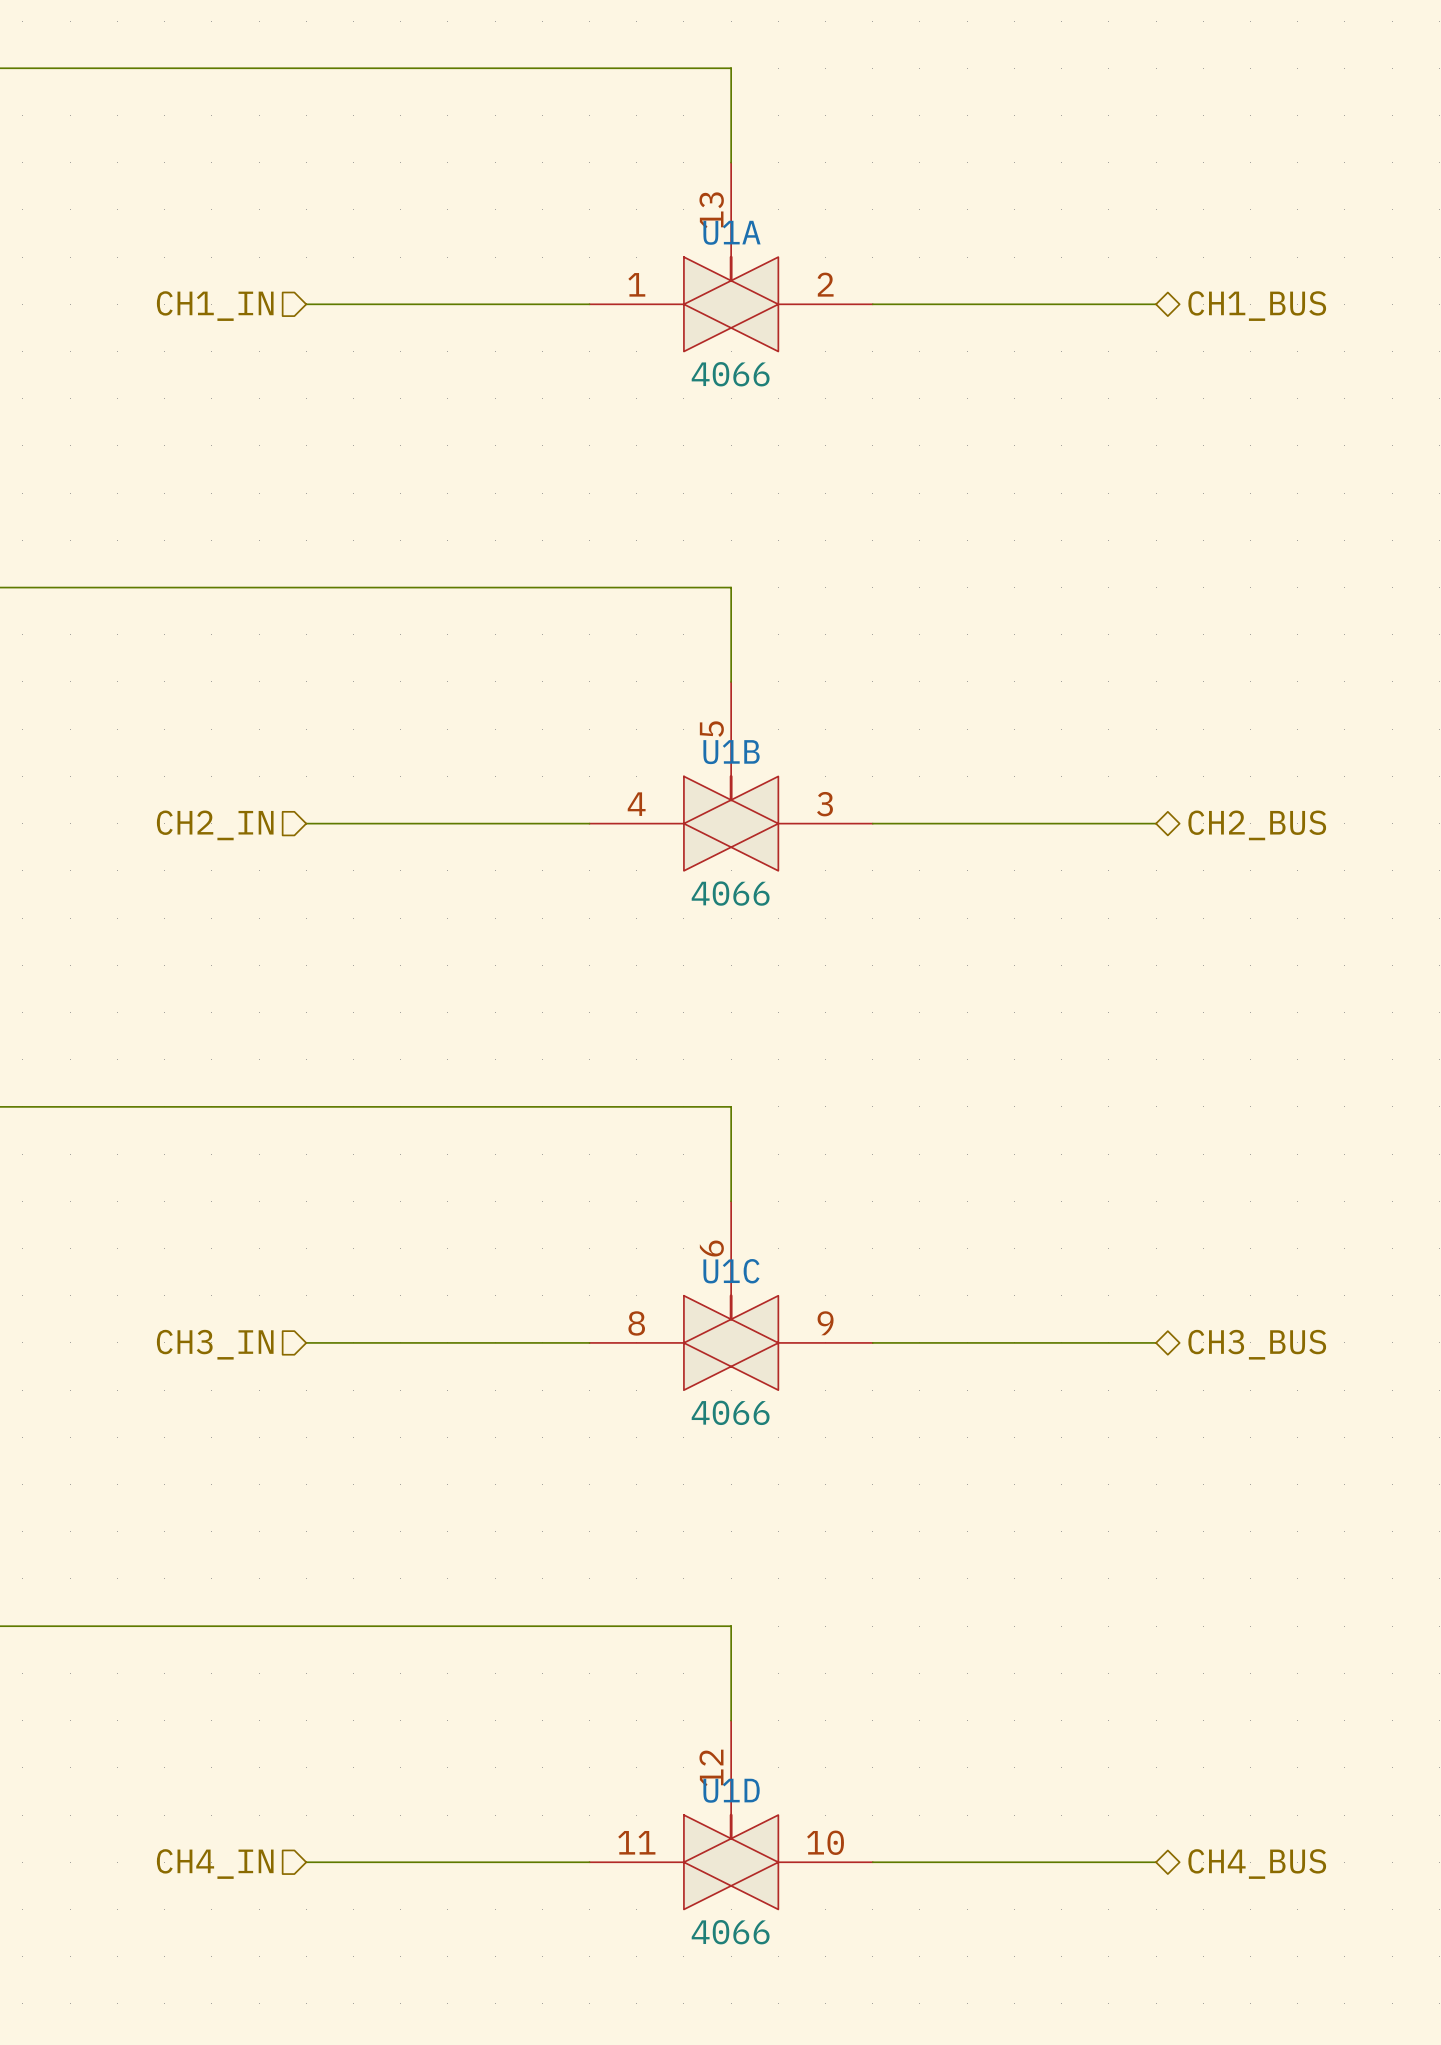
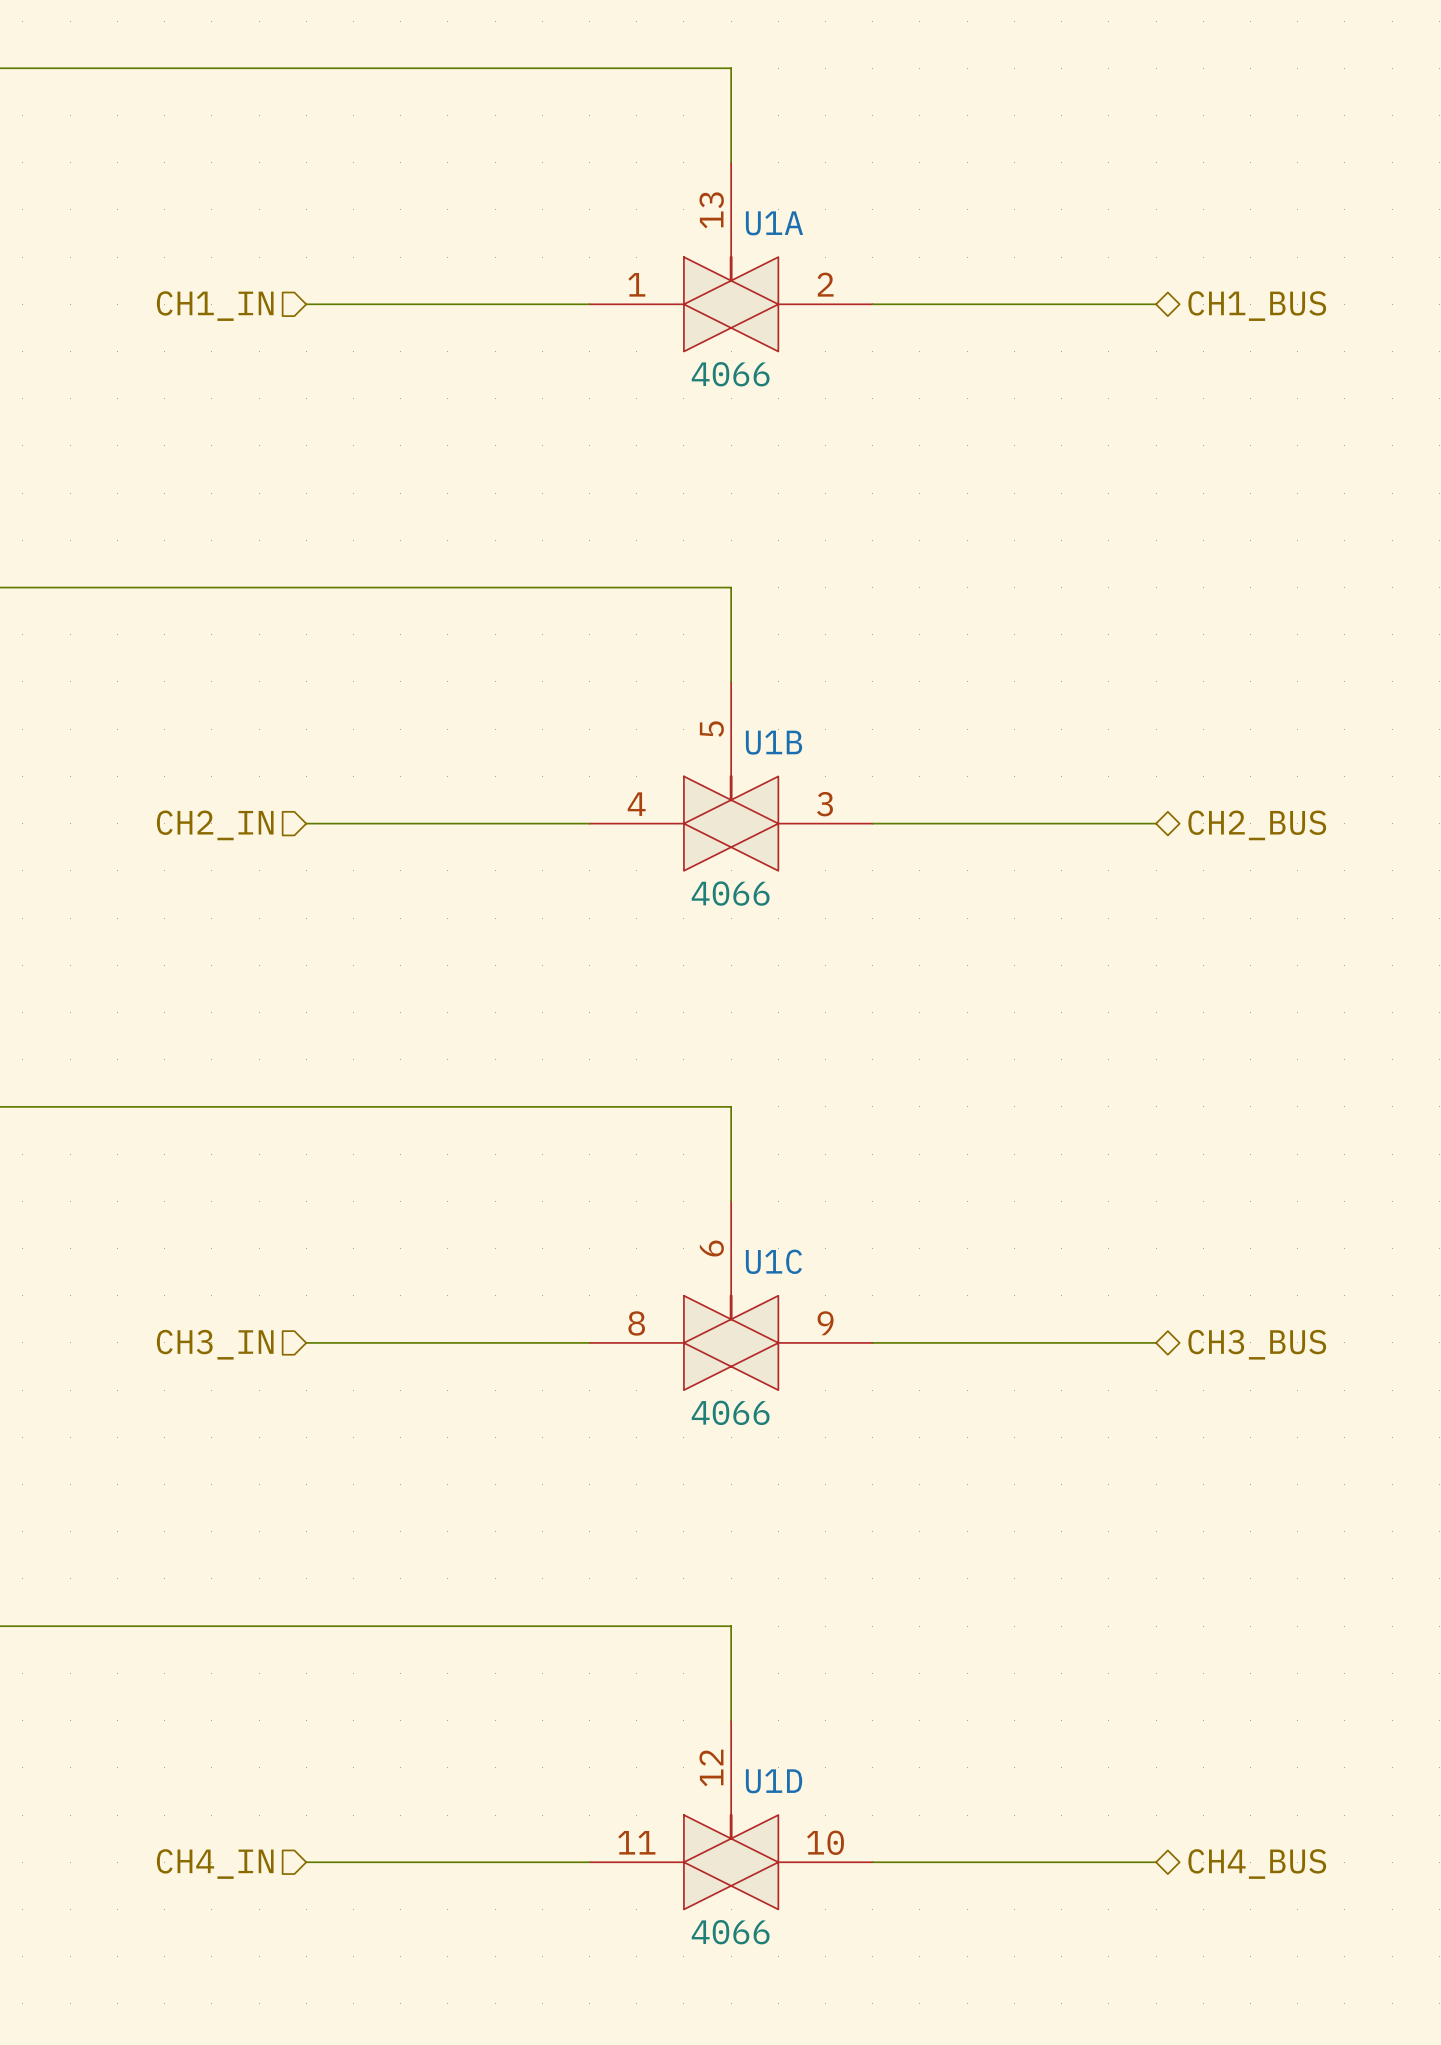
U1A name position: U1A (731, 232) -> U1A (774, 223)
U1B name position: U1B (731, 752) -> U1B (774, 742)
U1C name position: U1C (731, 1271) -> U1C (773, 1261)
U1D name position: U1D (731, 1790) -> U1D (774, 1781)

